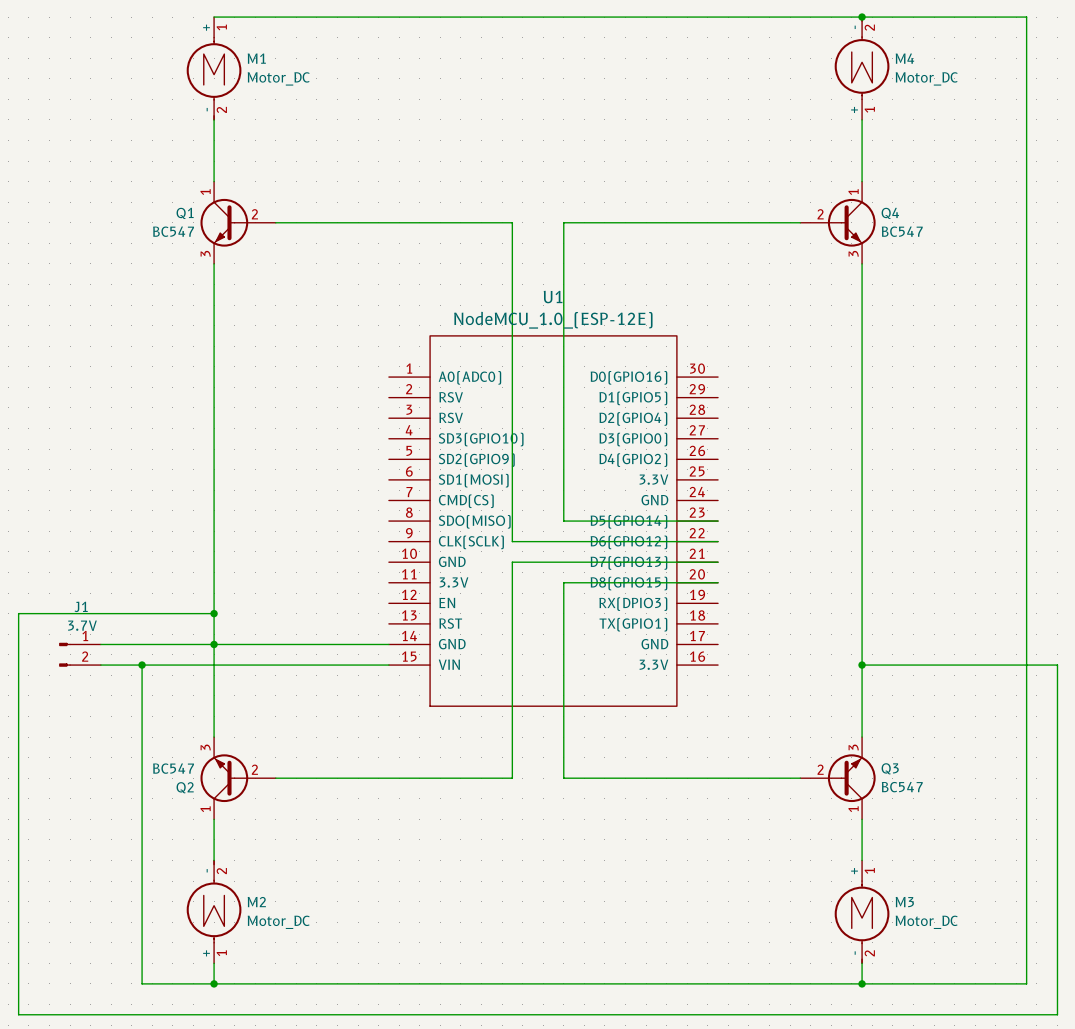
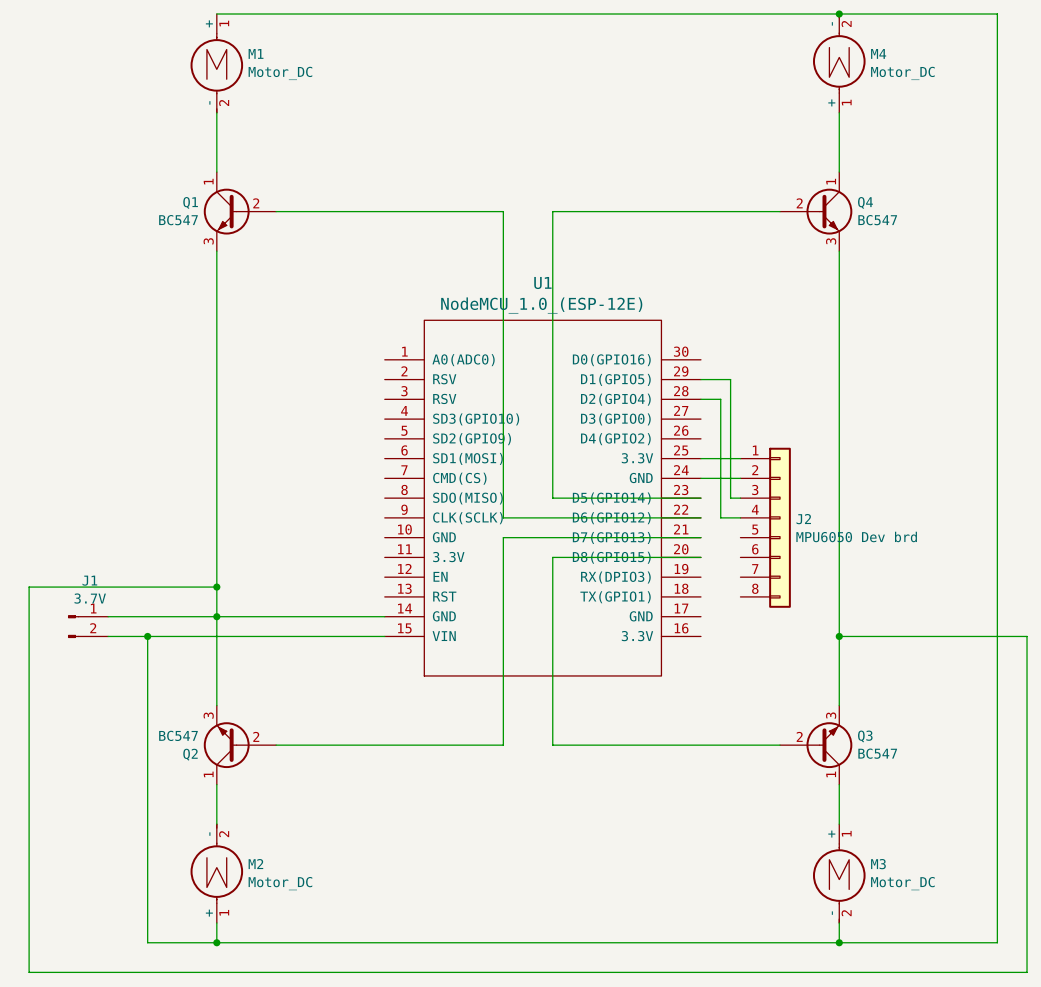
wire: none -> (700, 379) (730, 379) (730, 498) (740, 498)
wire: none -> (700, 399) (720, 399) (720, 517) (740, 517)
wire: none -> (700, 458) (740, 458)
wire: none -> (700, 478) (740, 478)
J2: none -> MPU6050 Dev brd (765, 527)

